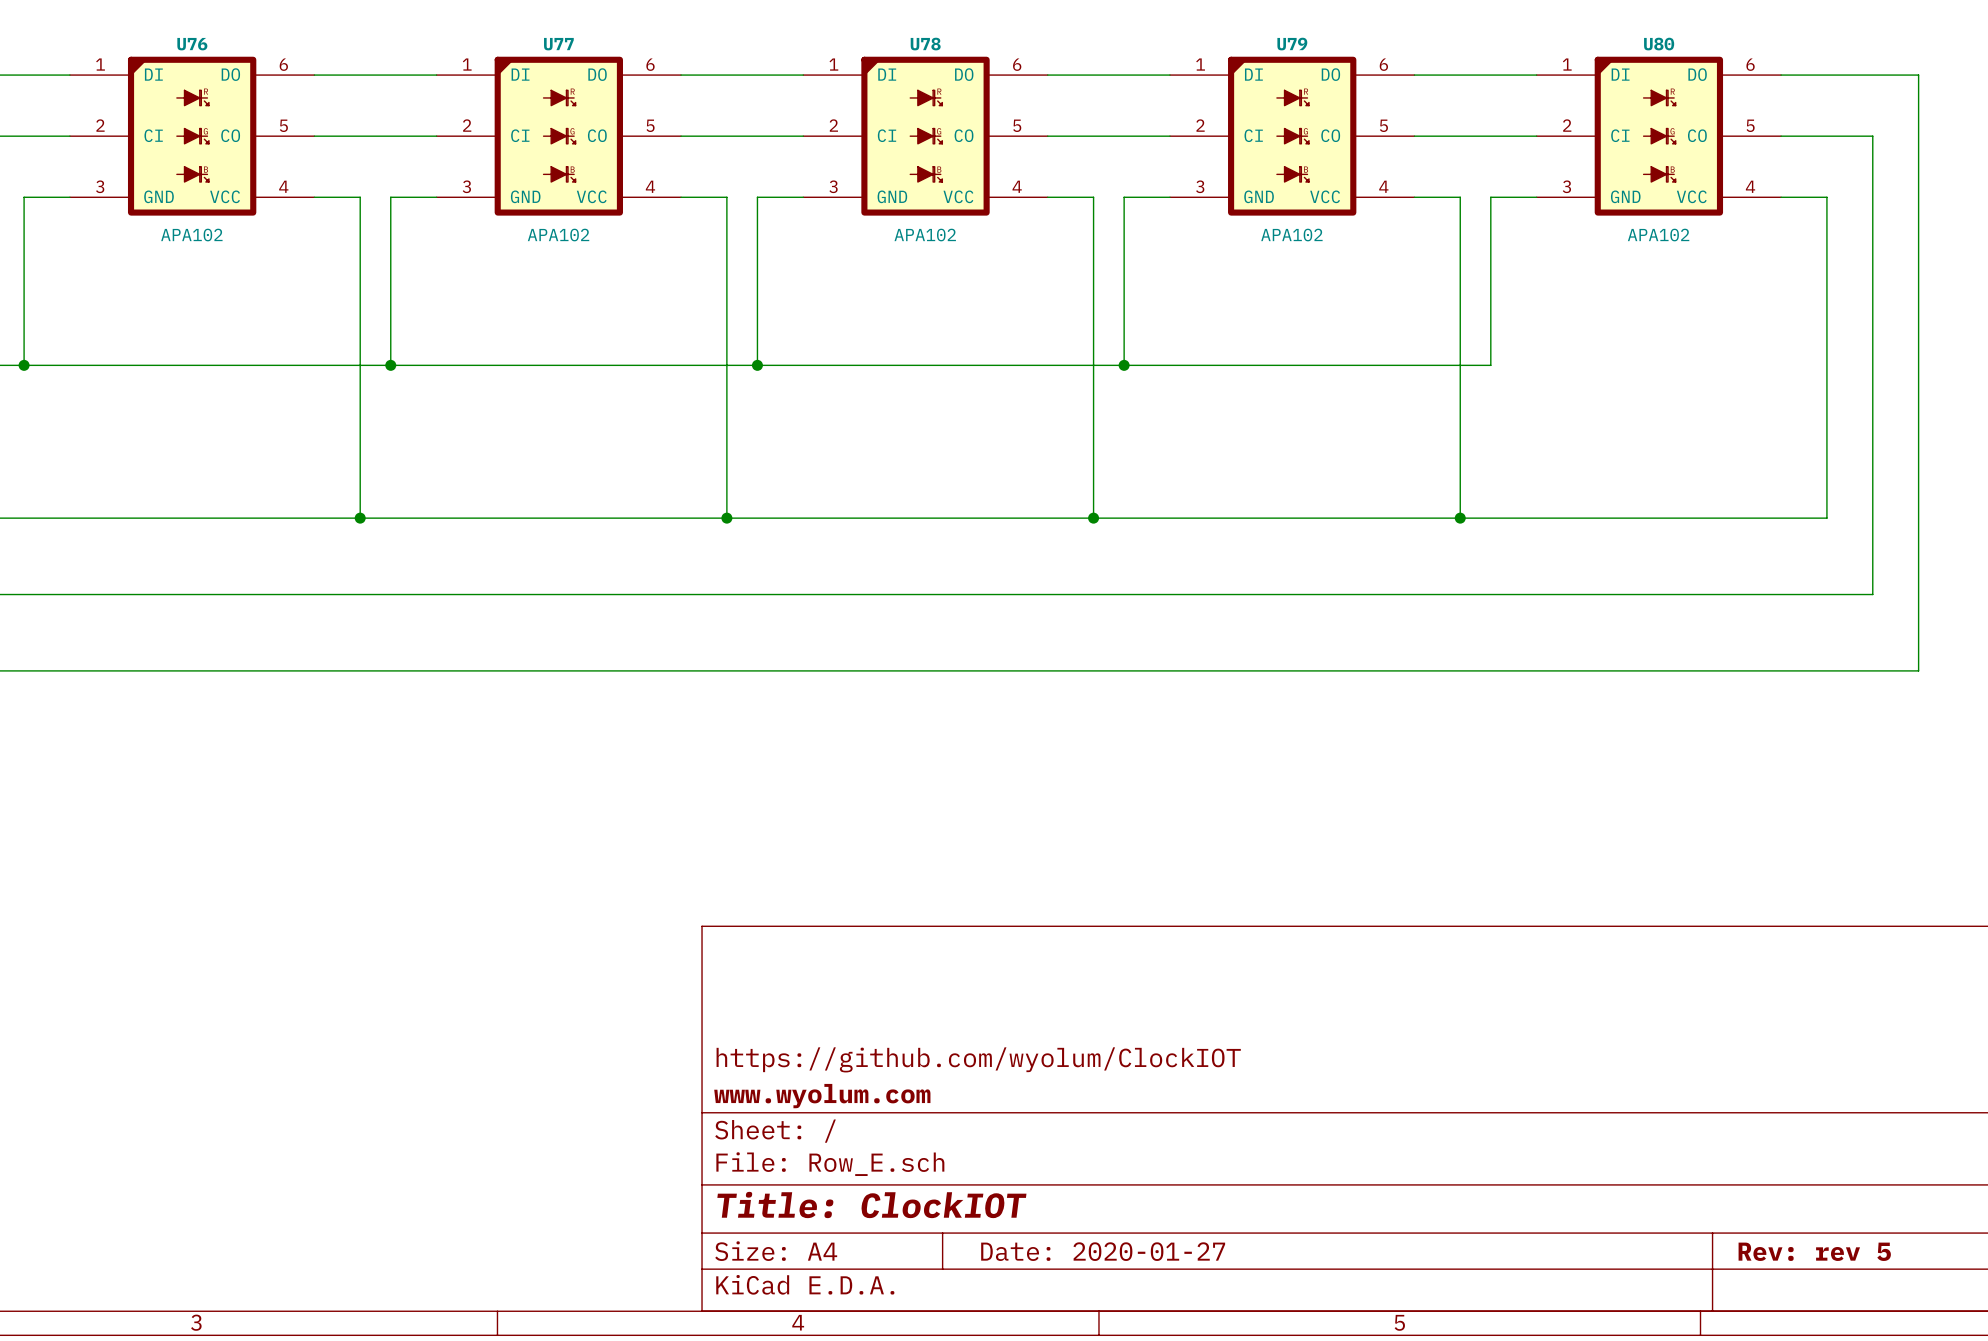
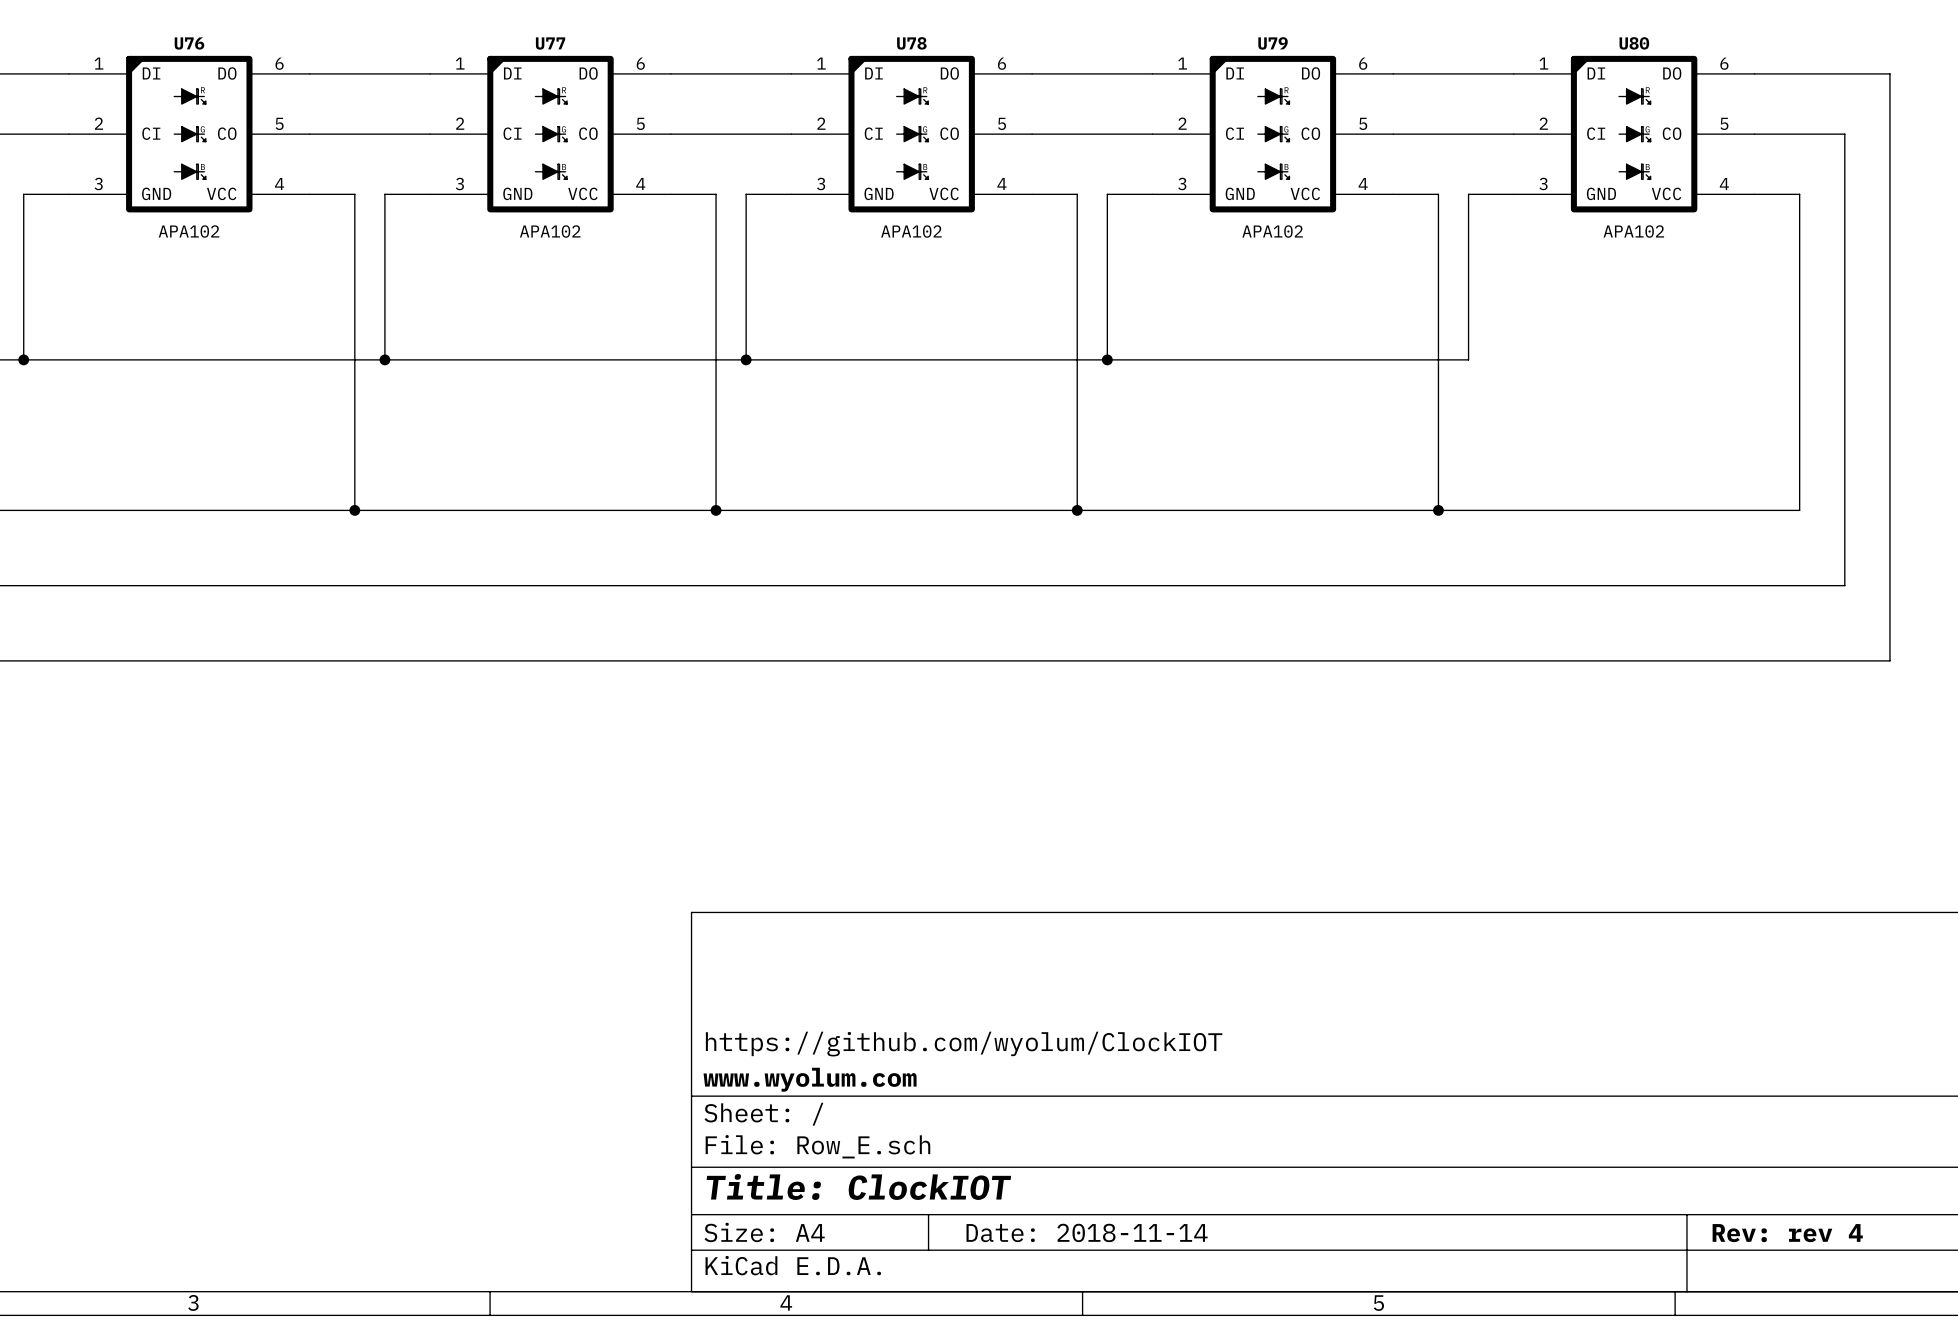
title block: Date: 2020-01-27 (1103, 1251) -> Date: 2018-11-14 (1087, 1232)
title block: Rev: rev 5 (1814, 1251) -> Rev: rev 4 (1787, 1233)

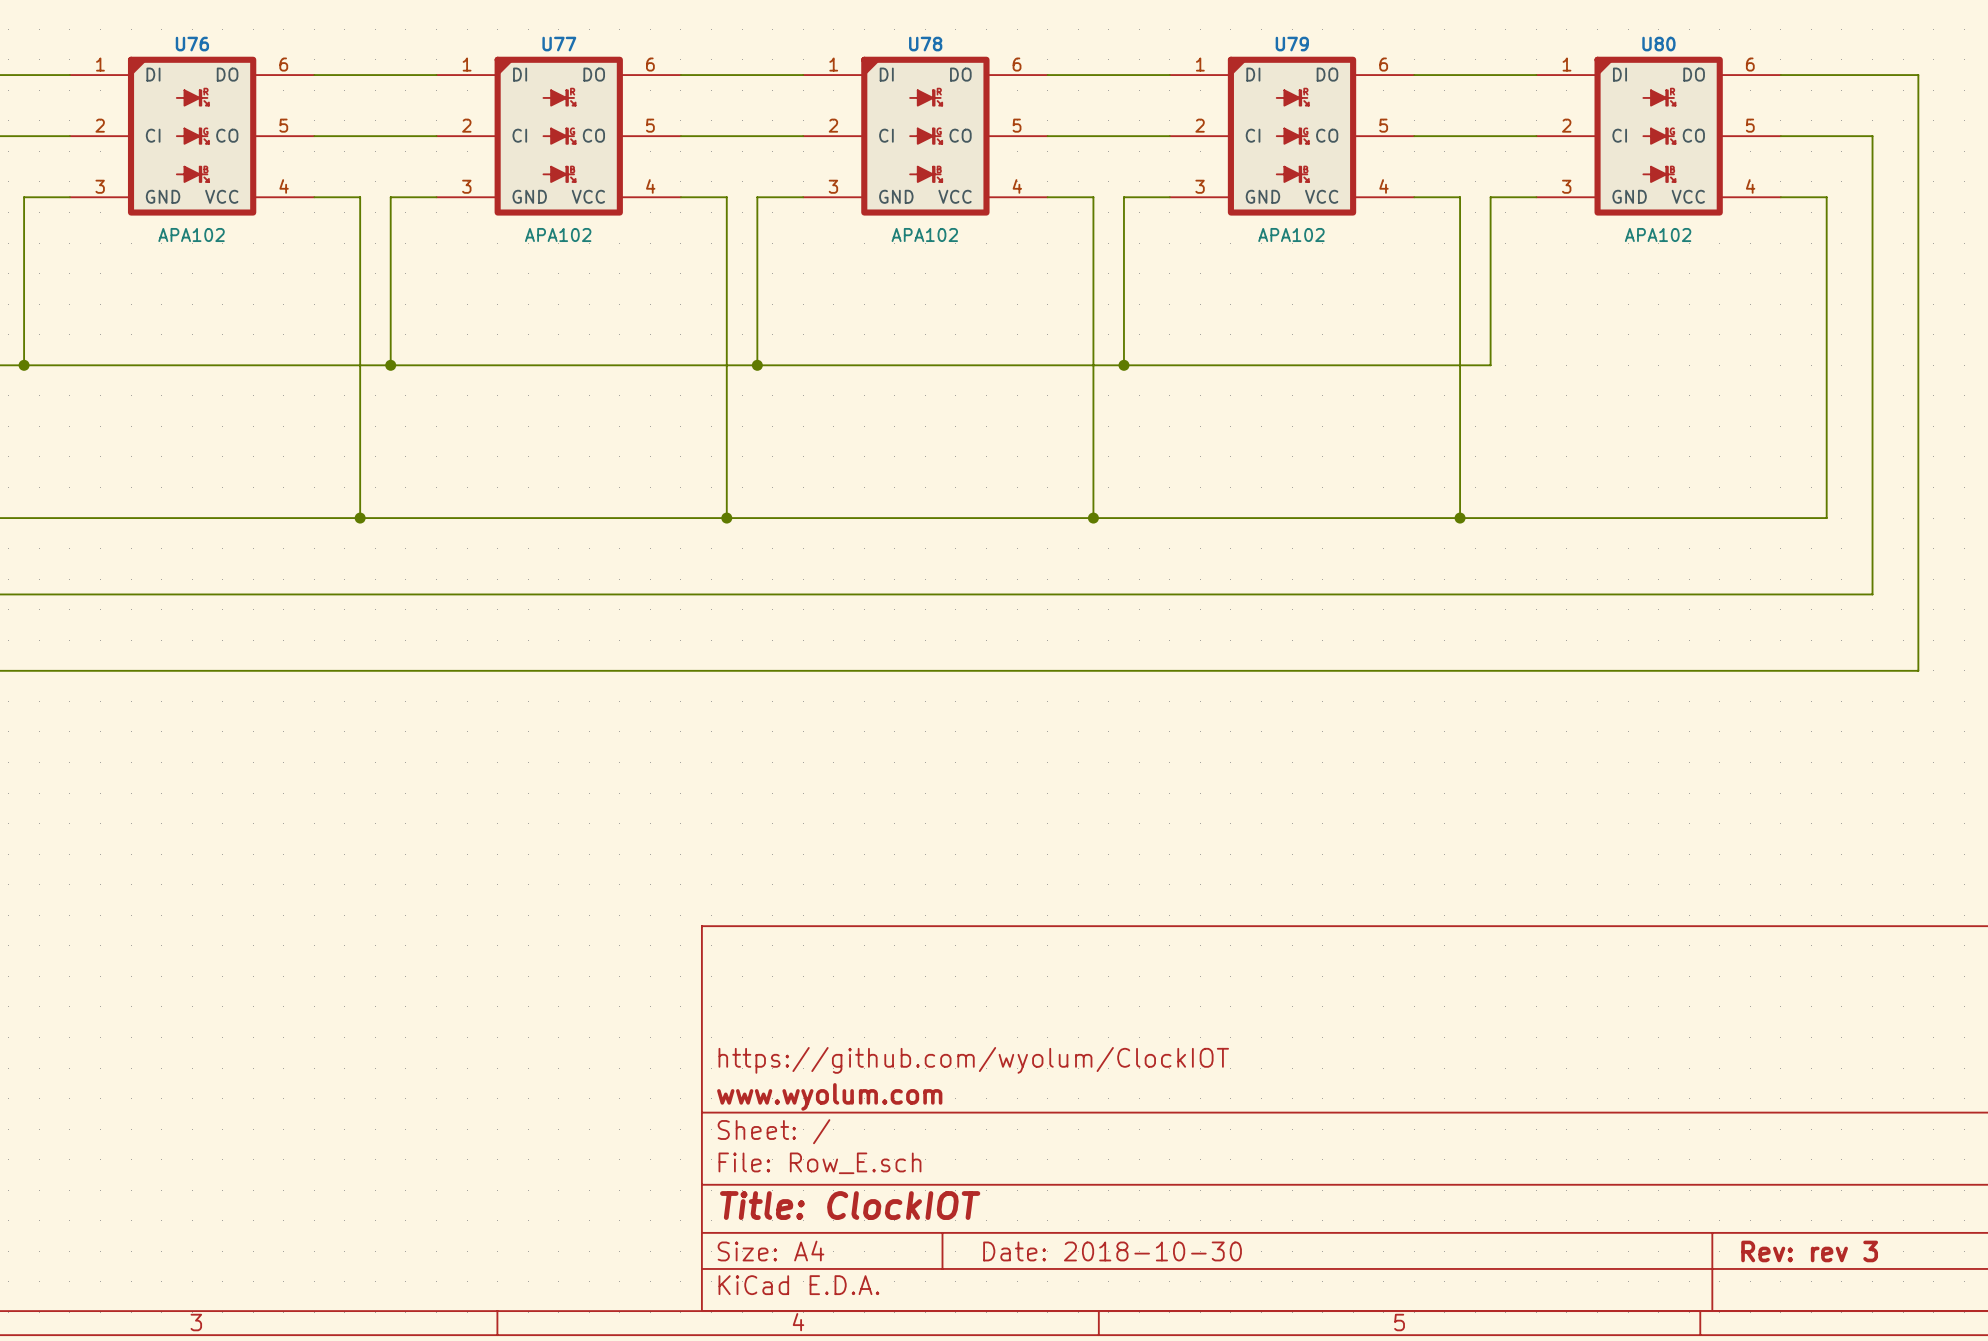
title block: Date: 2018-11-14 (1087, 1232) -> Date: 2018-10-30 (1112, 1251)
title block: Rev: rev 4 (1787, 1233) -> Rev: rev 3 (1809, 1251)

